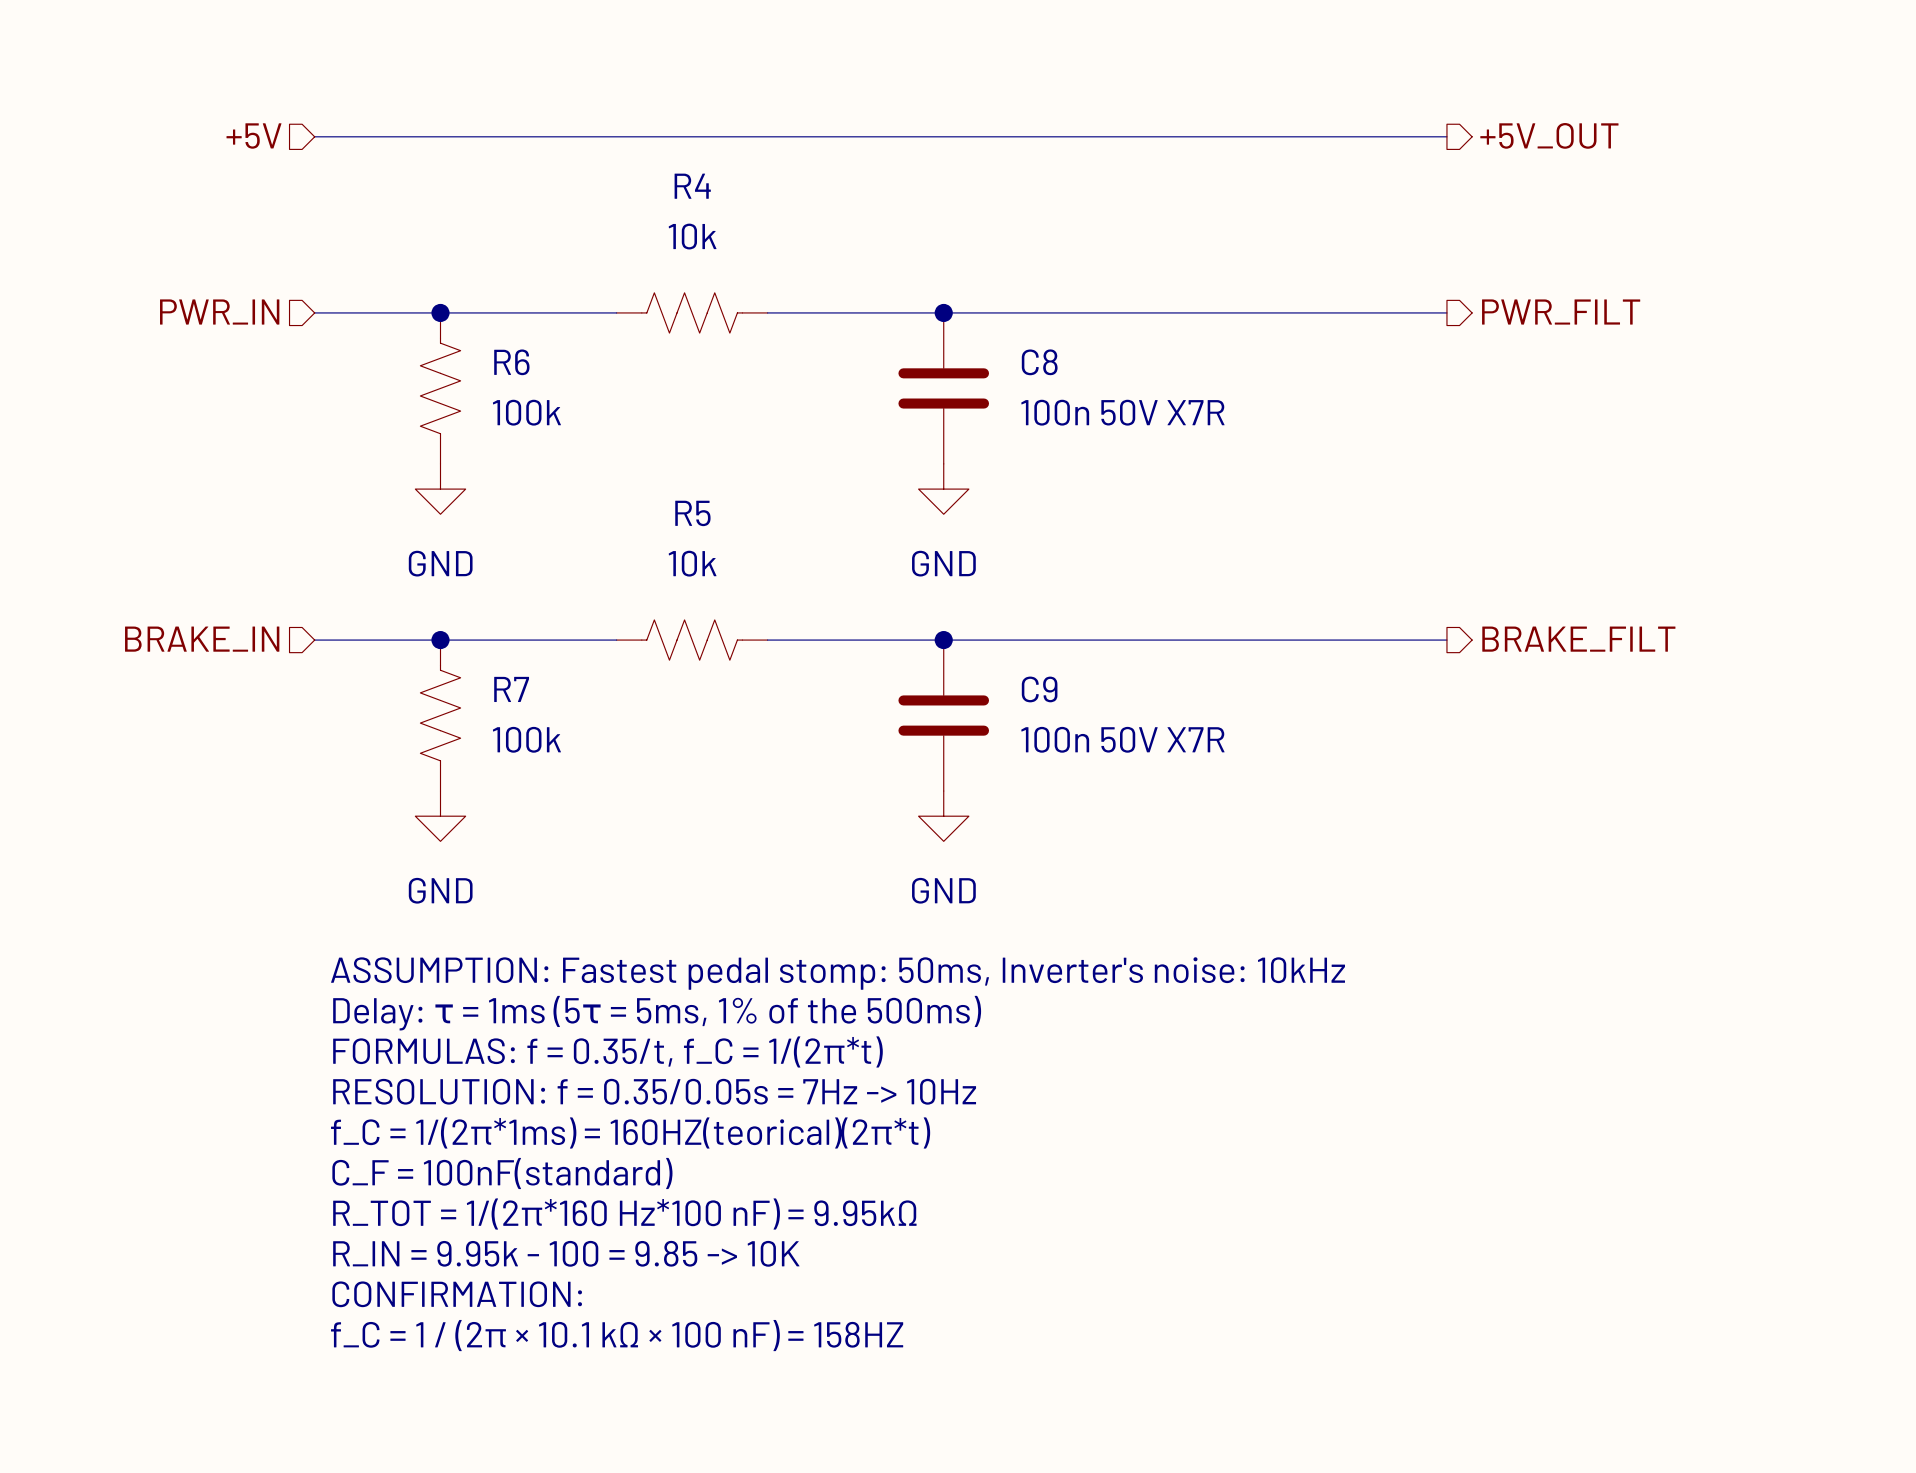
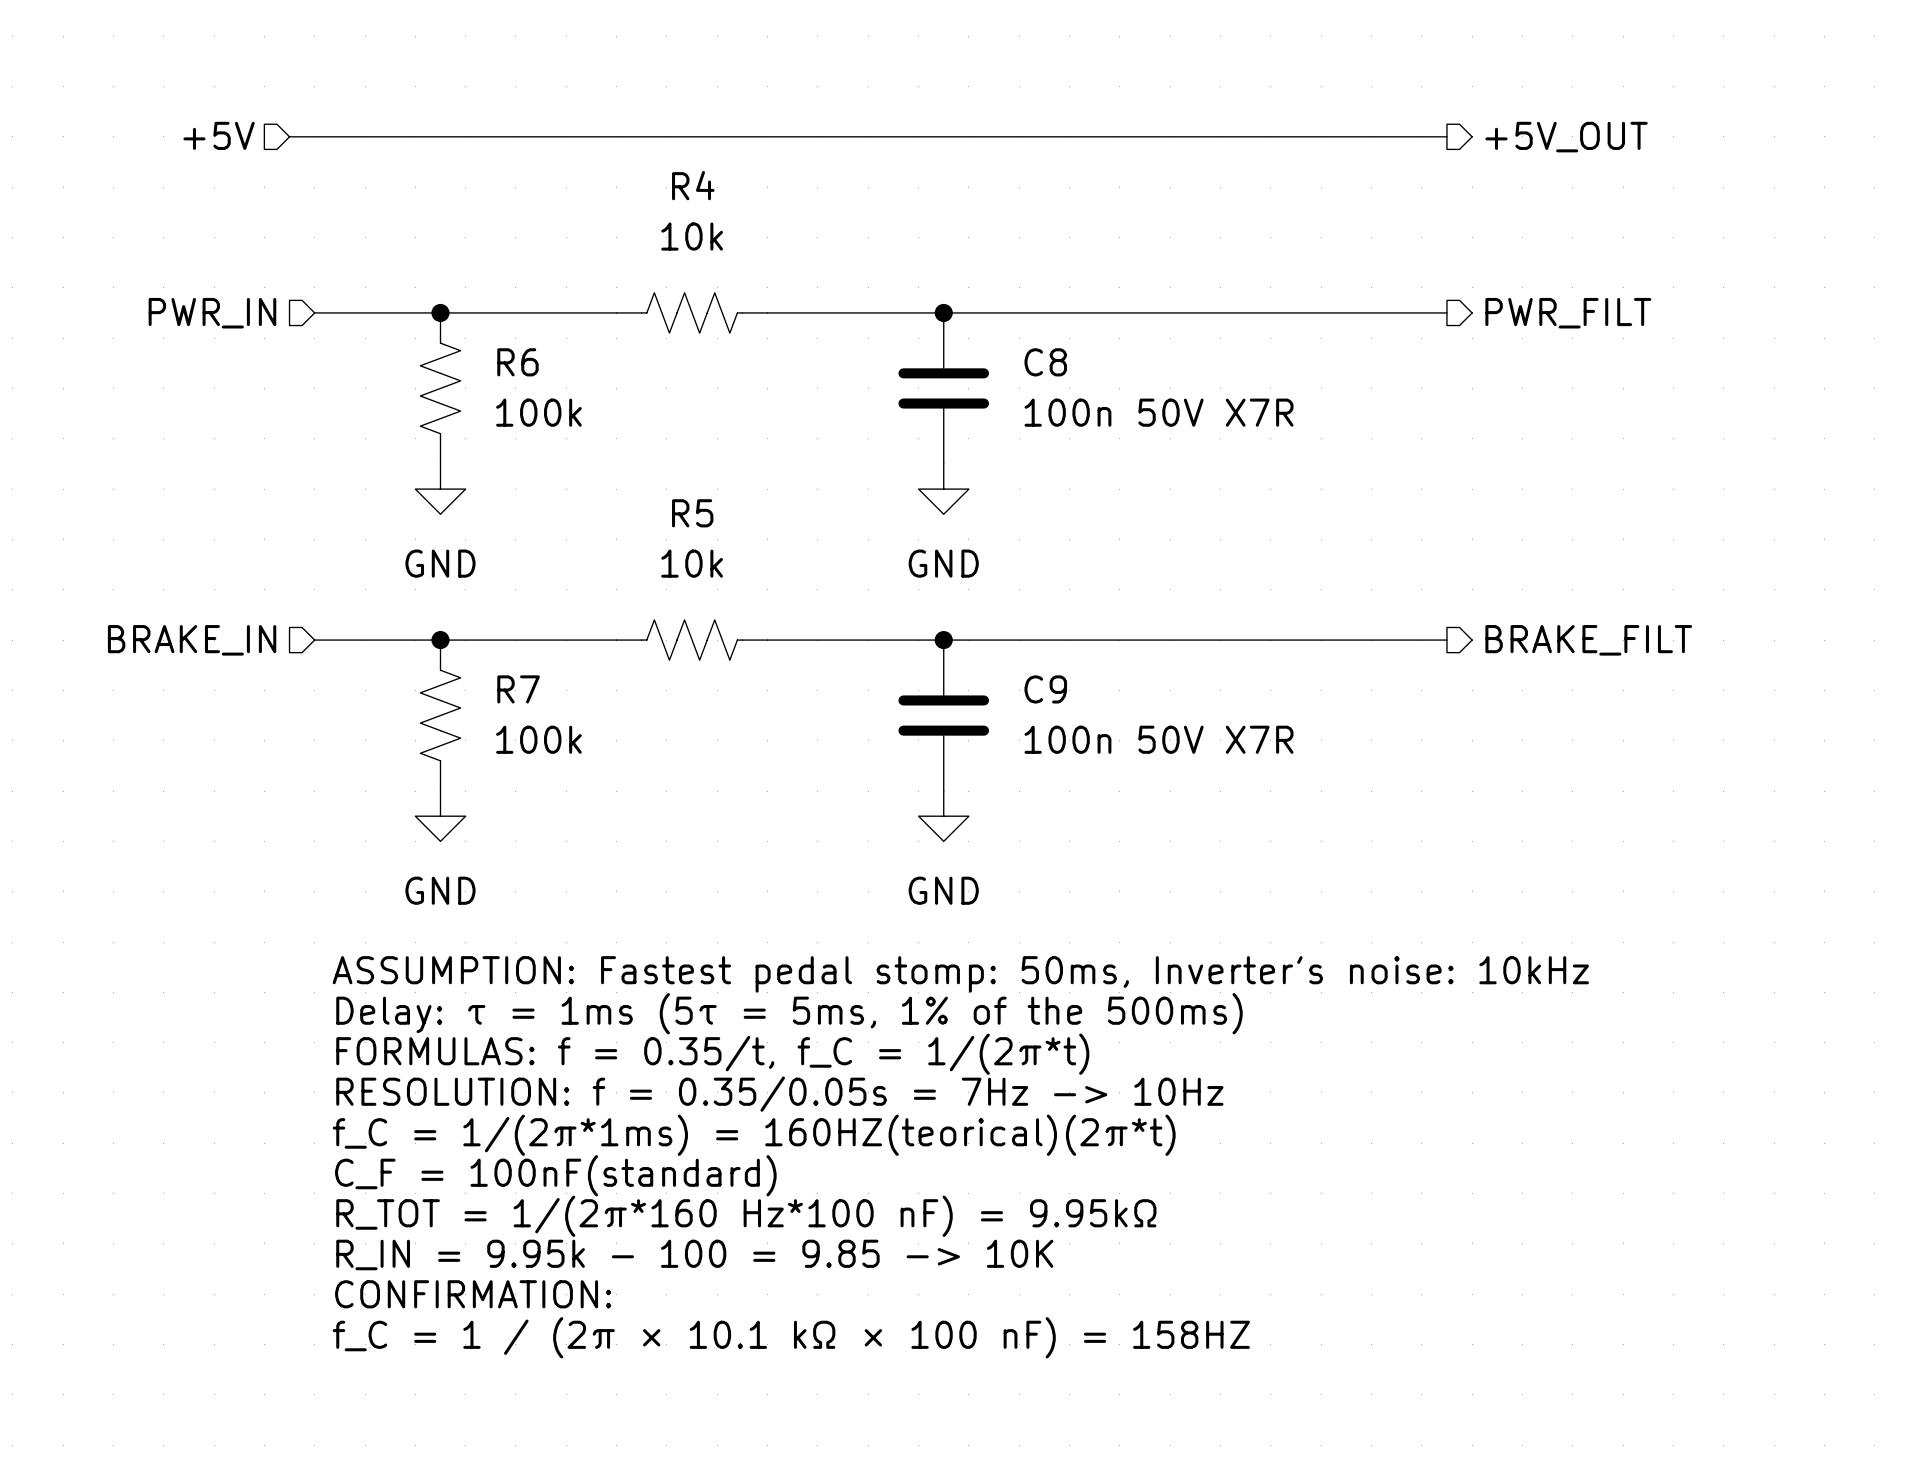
hierarchical label position: +5V (254, 136) -> +5V (219, 135)
wire: none -> (289, 136) (314, 136)

